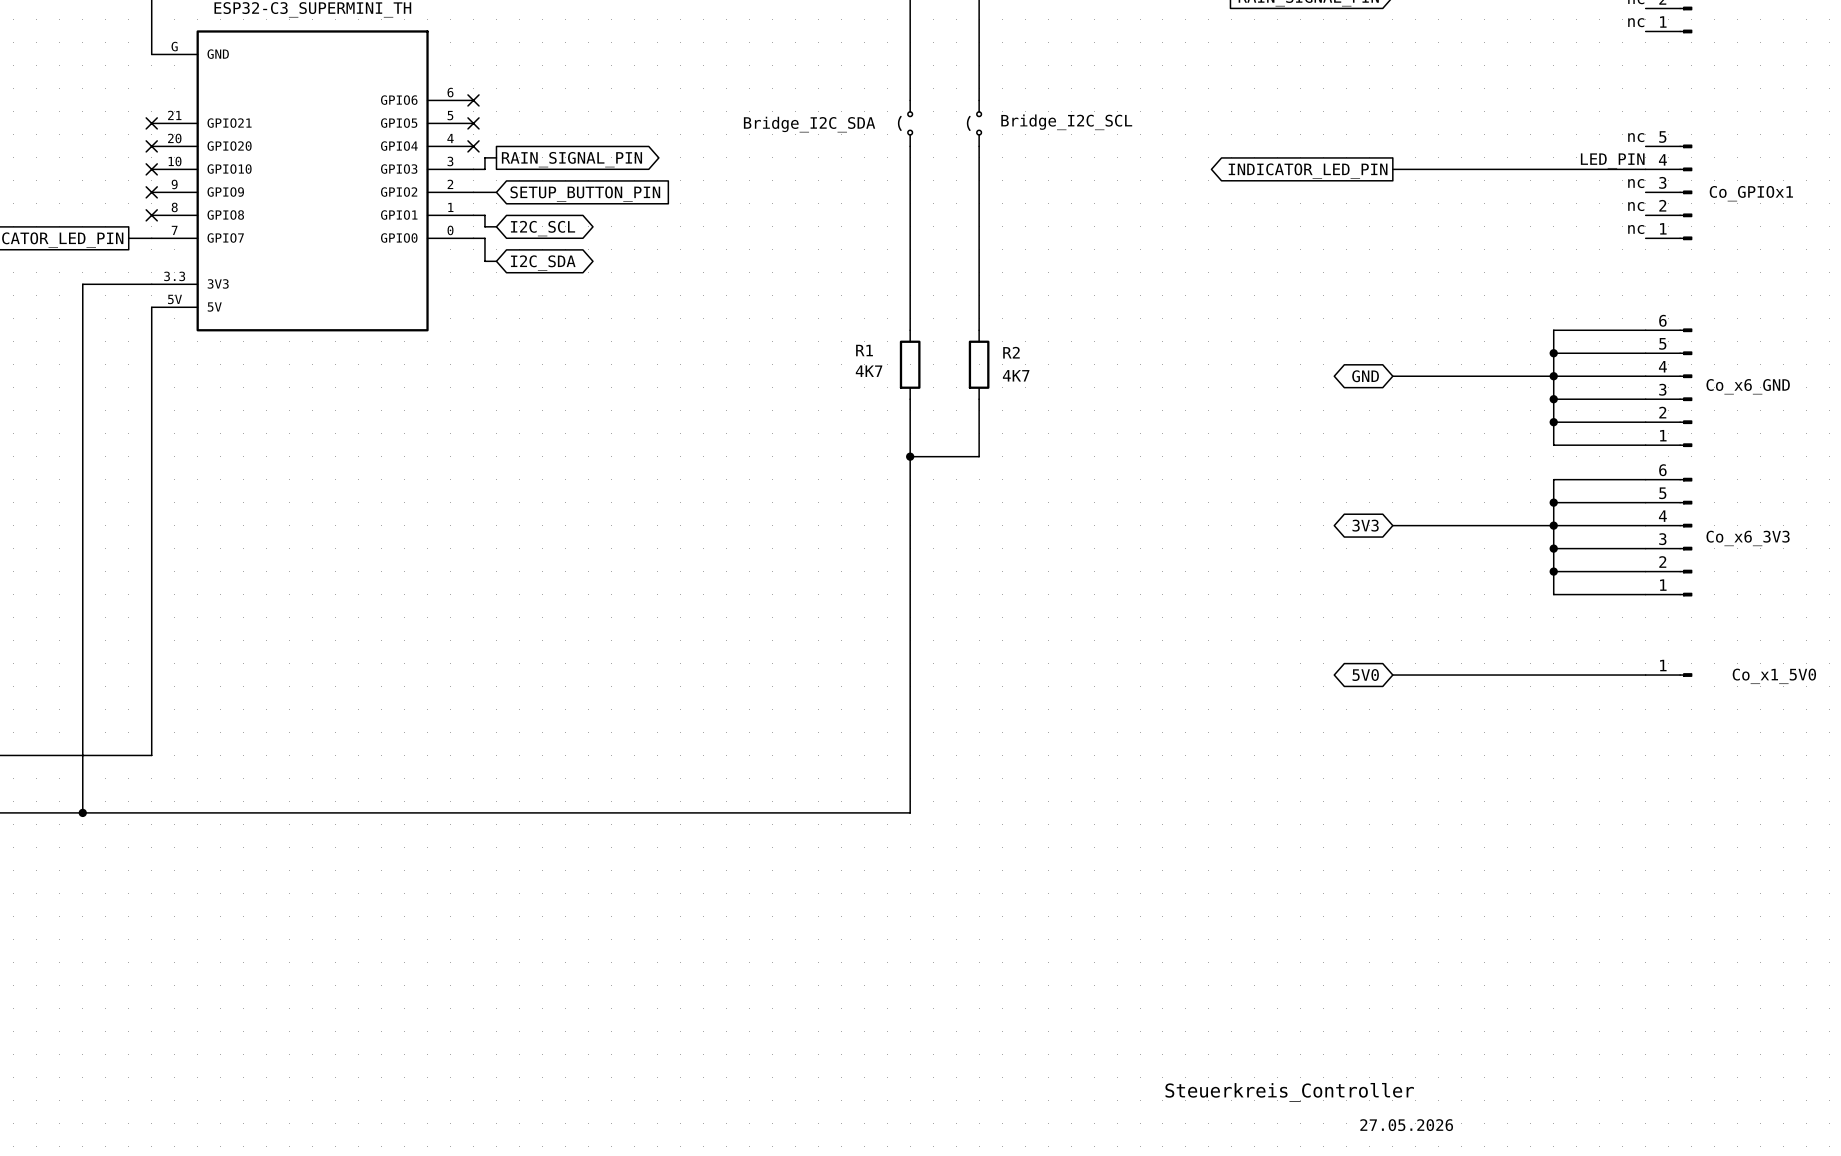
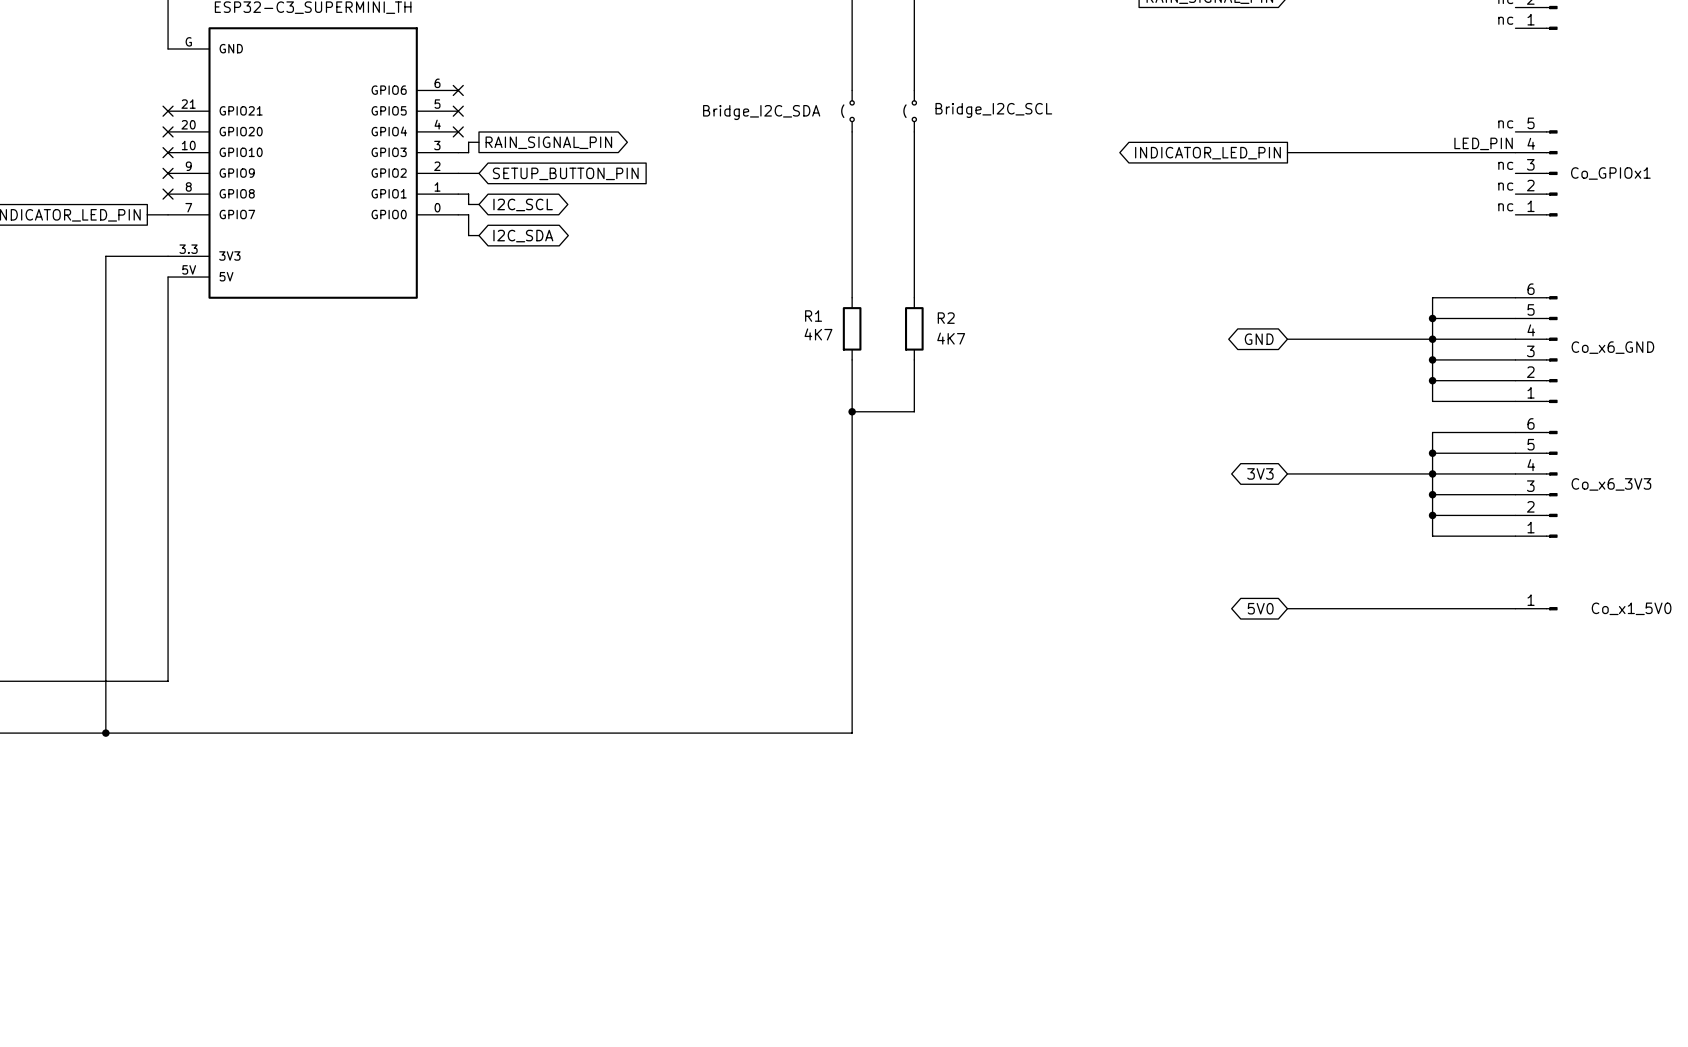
text: Steuerkreis_Controller (1289, 1092) -> none
text: 27.05.2026 (1406, 1125) -> none

